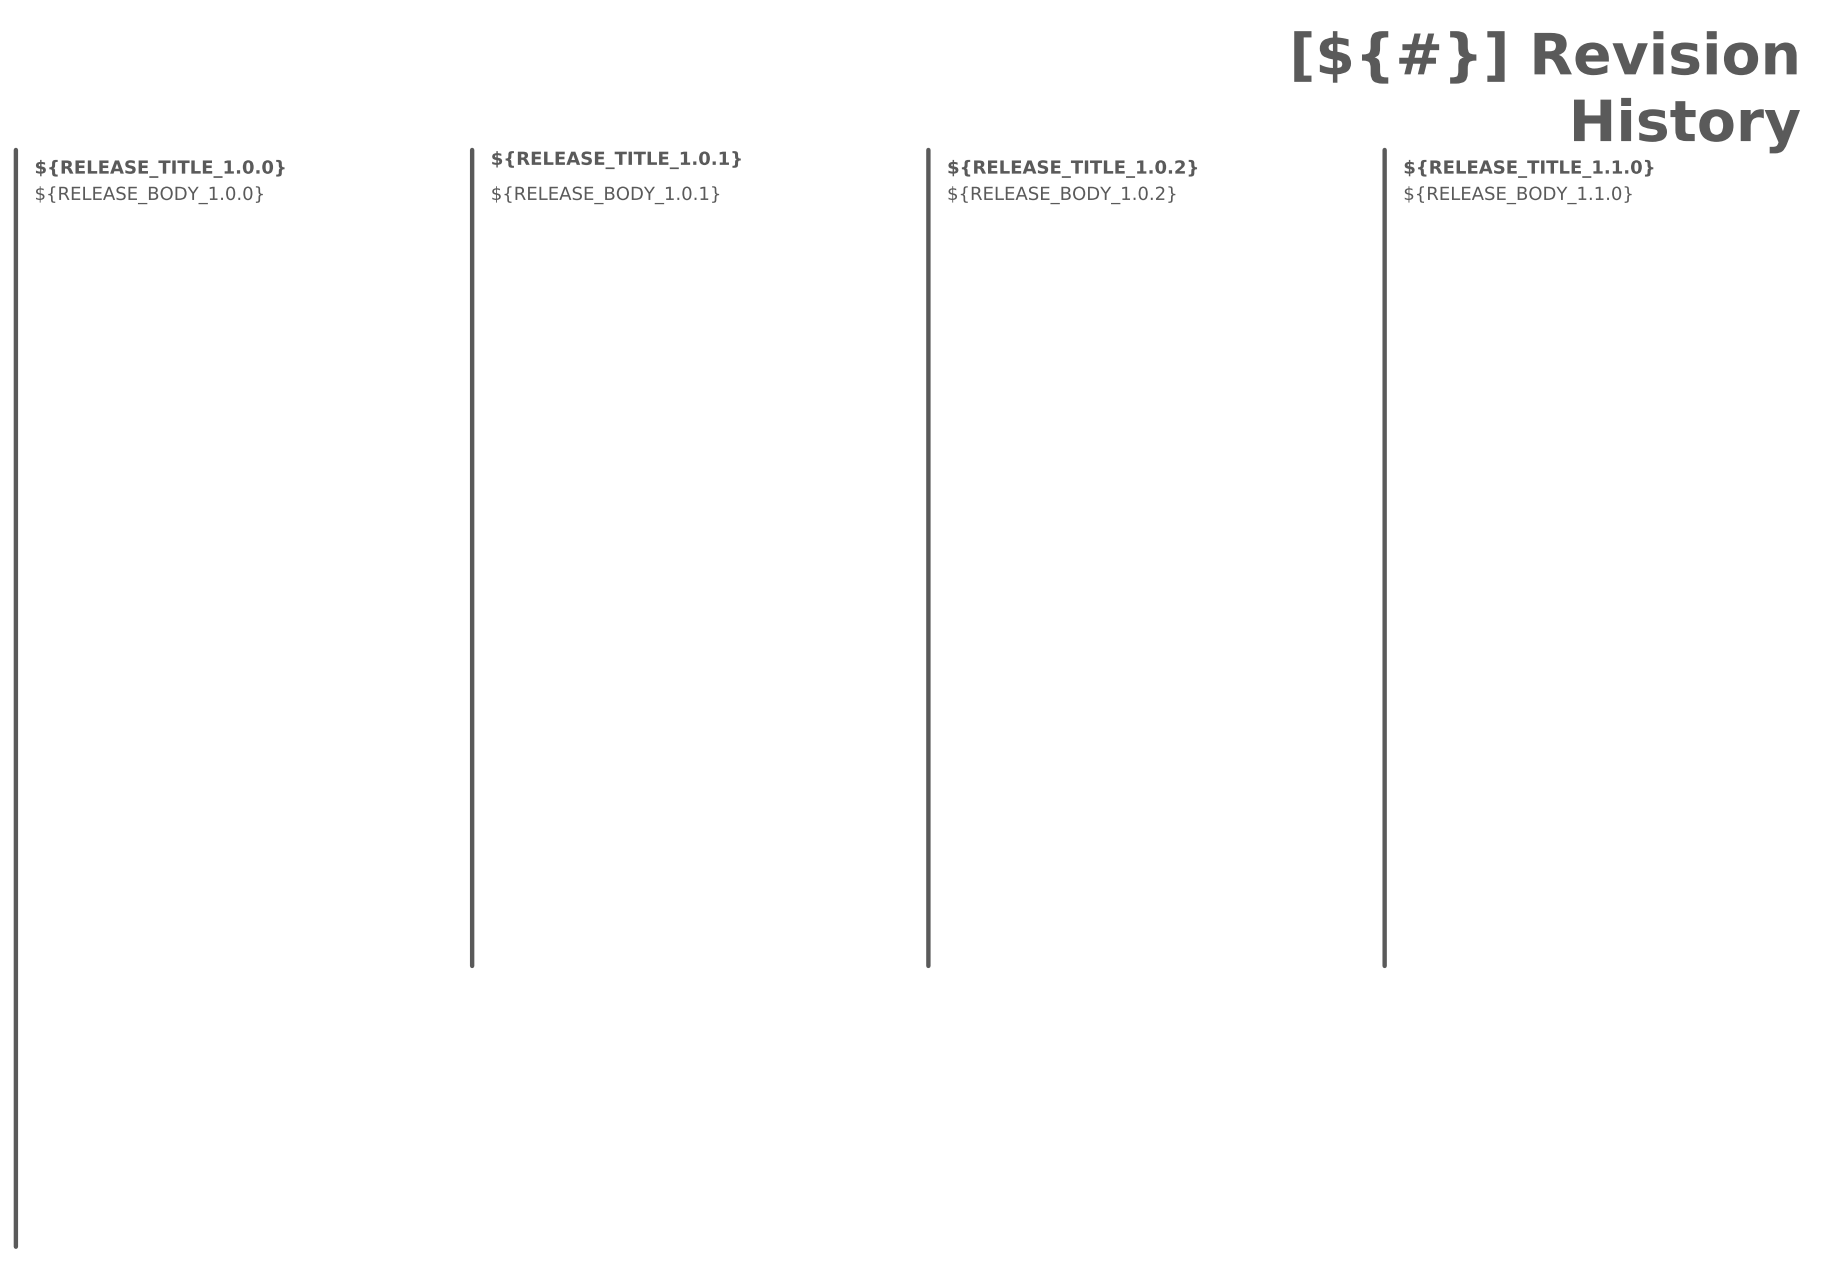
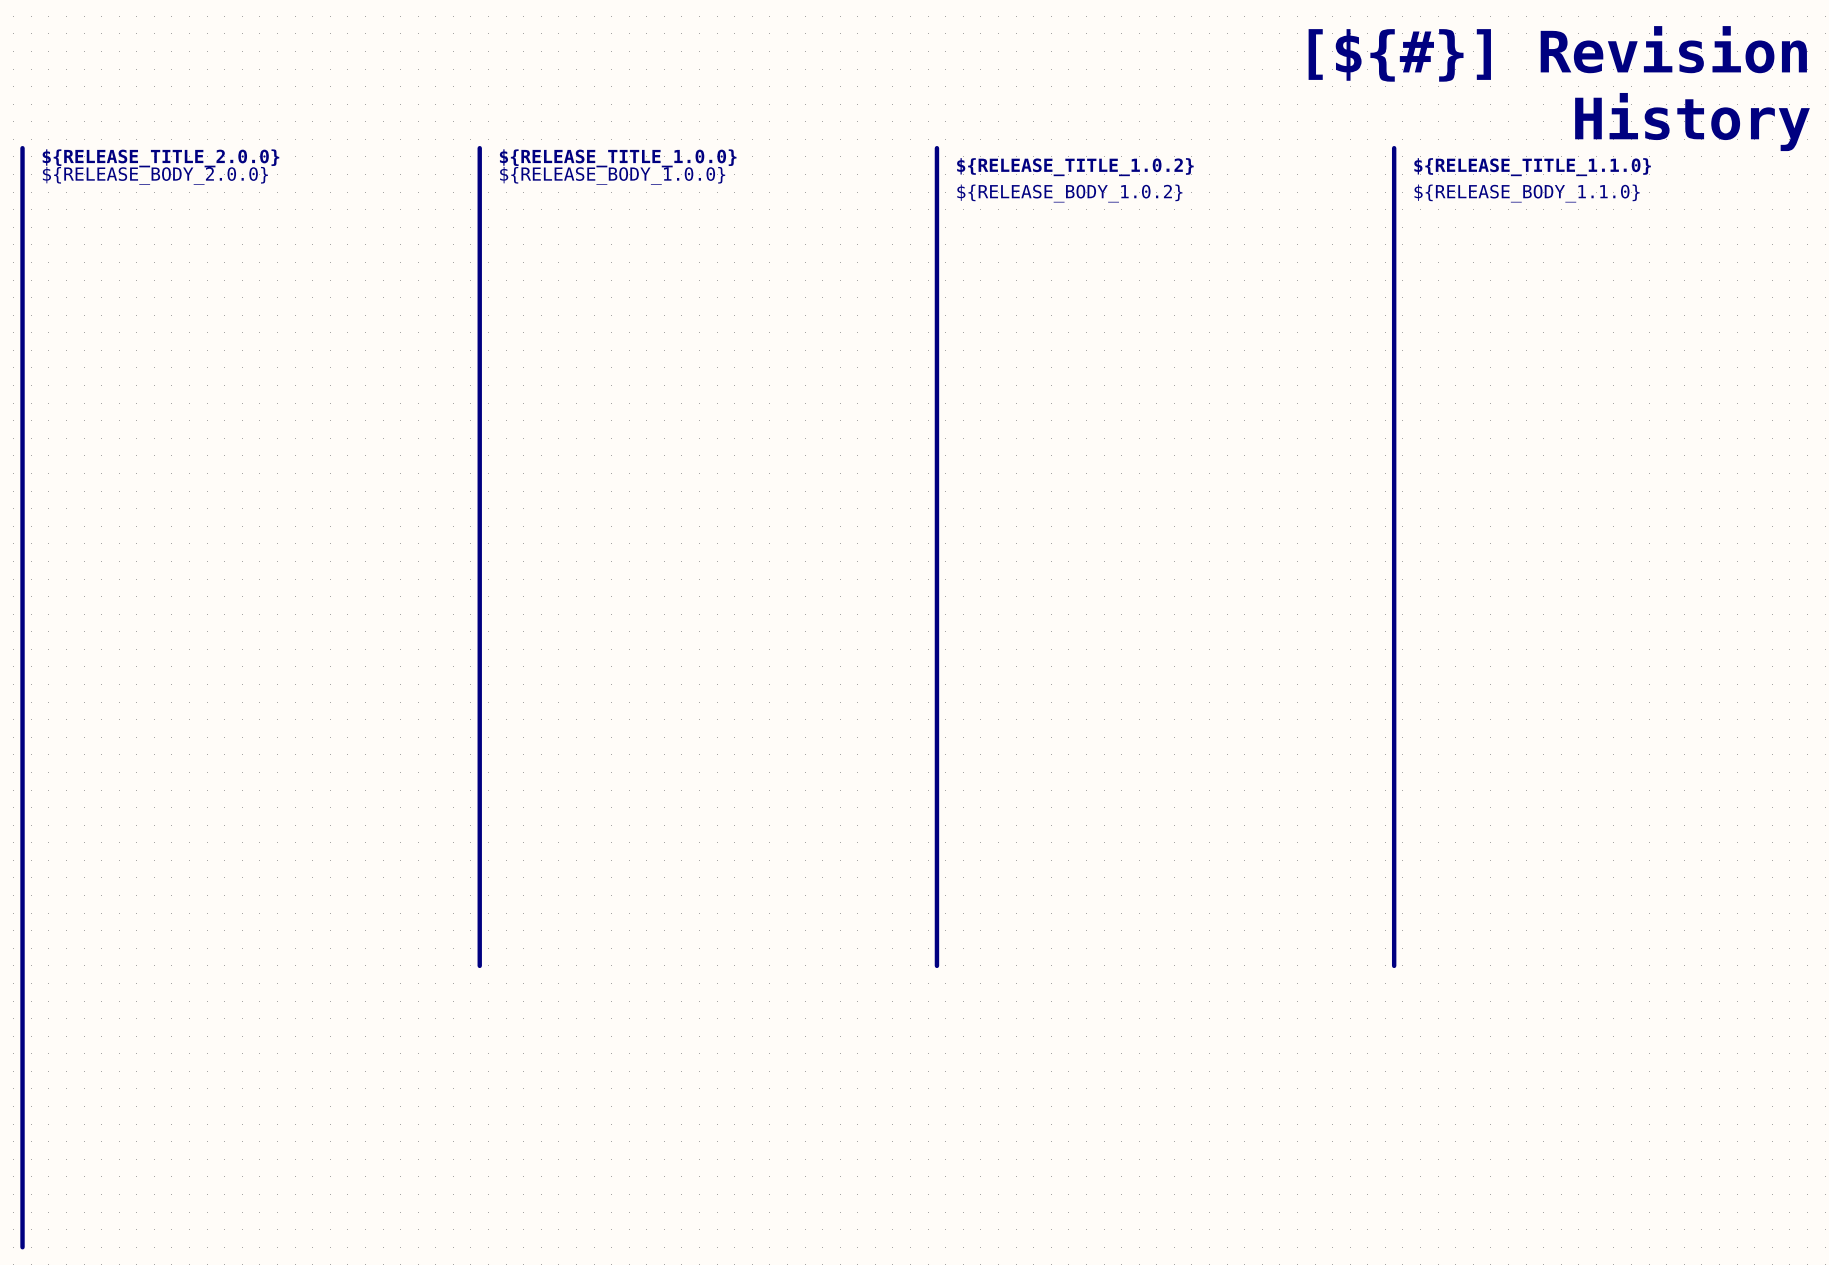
text: none -> ${RELEASE_TITLE_2.0.0} (160, 158)
text: ${RELEASE_TITLE_1.0.1} (616, 160) -> ${RELEASE_TITLE_1.0.0} (618, 158)
text: ${RELEASE_TITLE_1.0.0} (160, 168) -> none
text: none -> ${RELEASE_BODY_2.0.0} (155, 175)
text: ${RELEASE_BODY_1.0.0} (149, 195) -> none
text: ${RELEASE_BODY_1.0.1} (605, 195) -> ${RELEASE_BODY_1.0.0} (612, 175)

